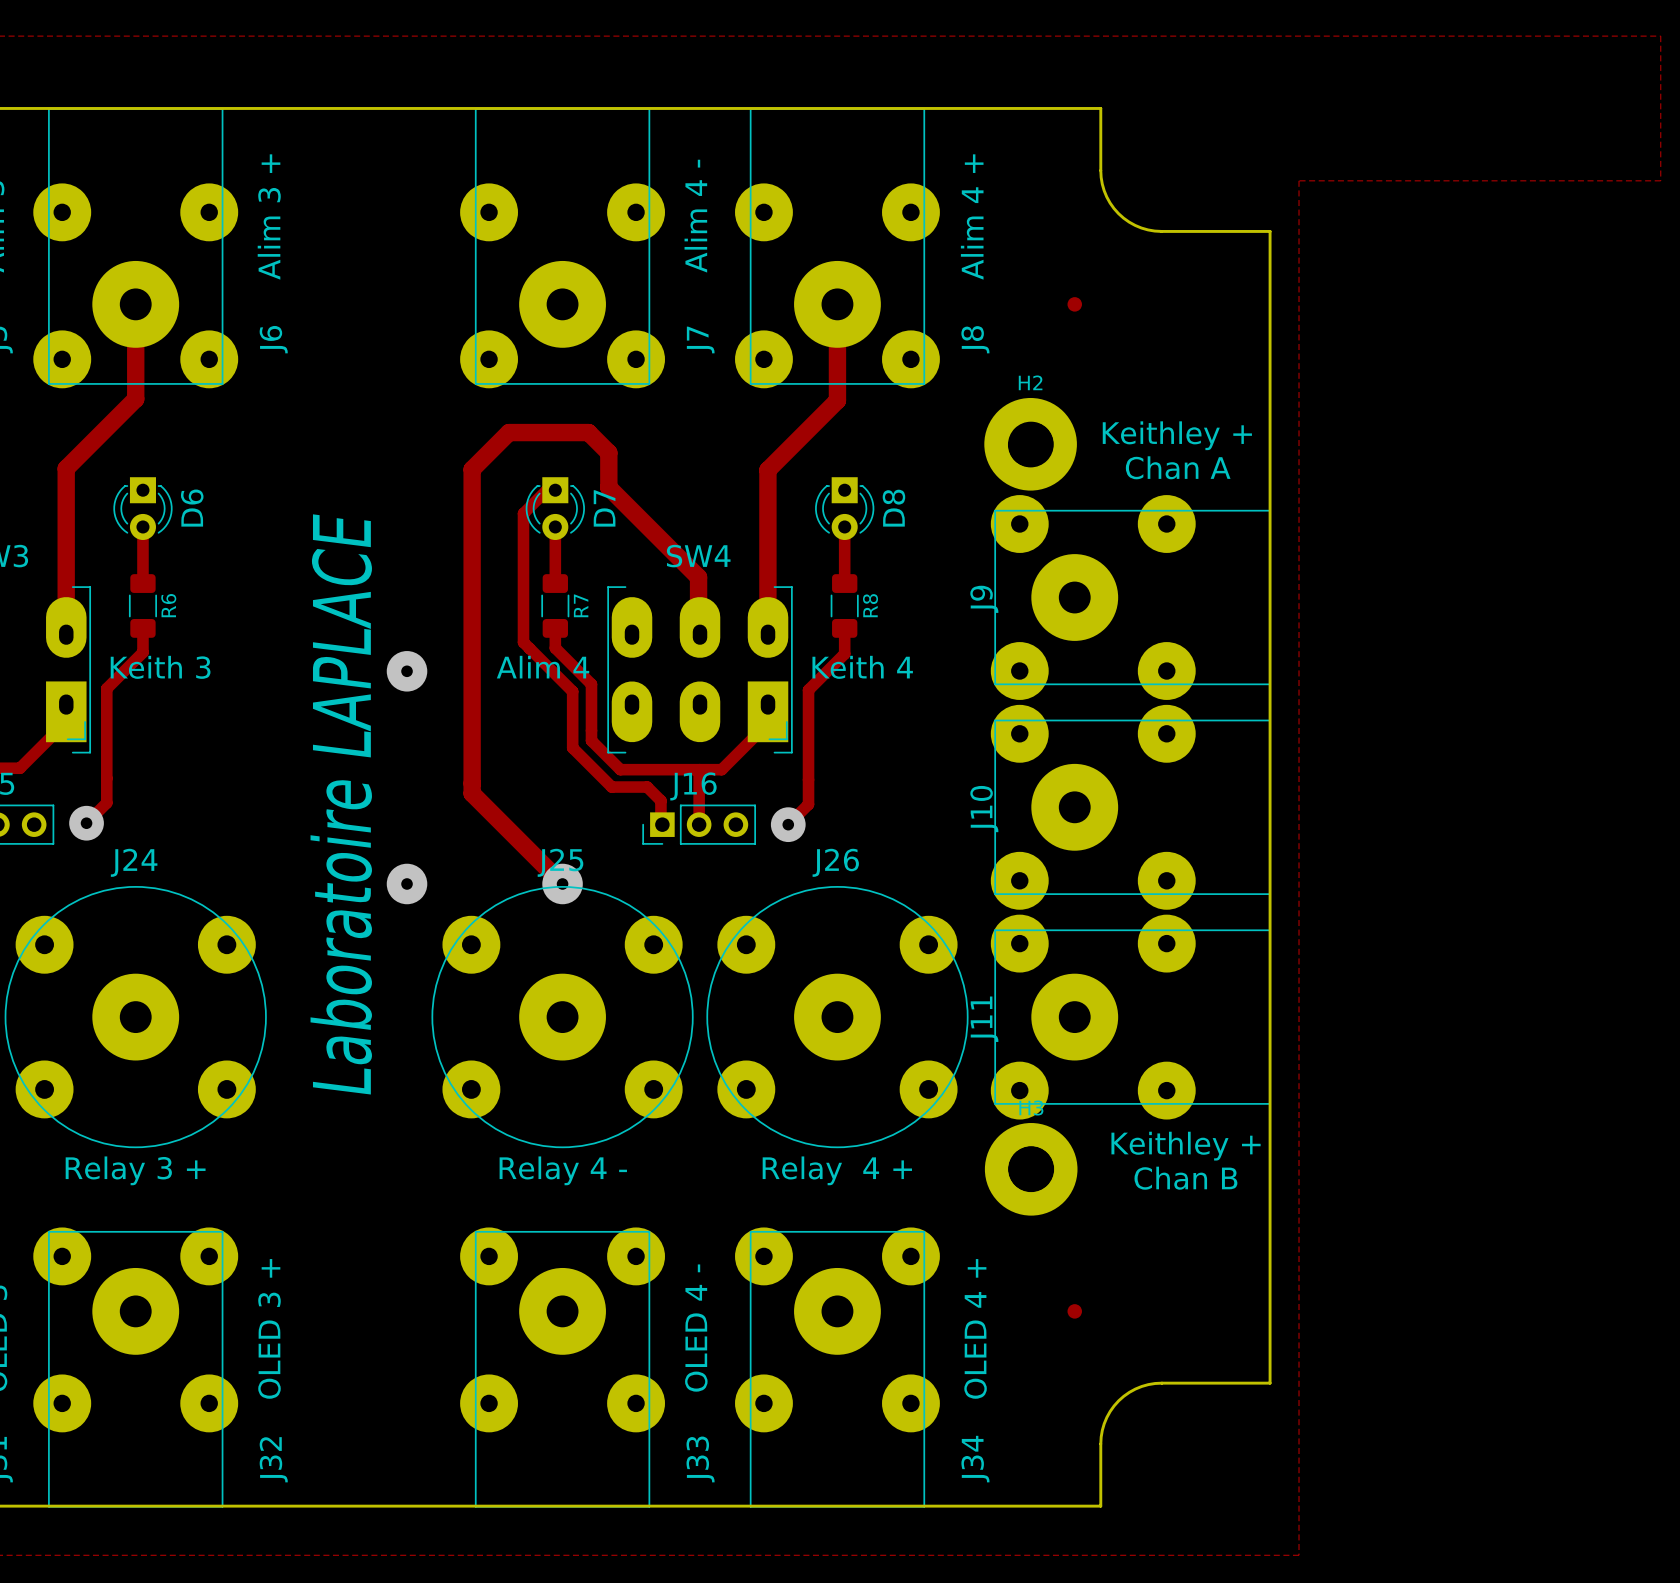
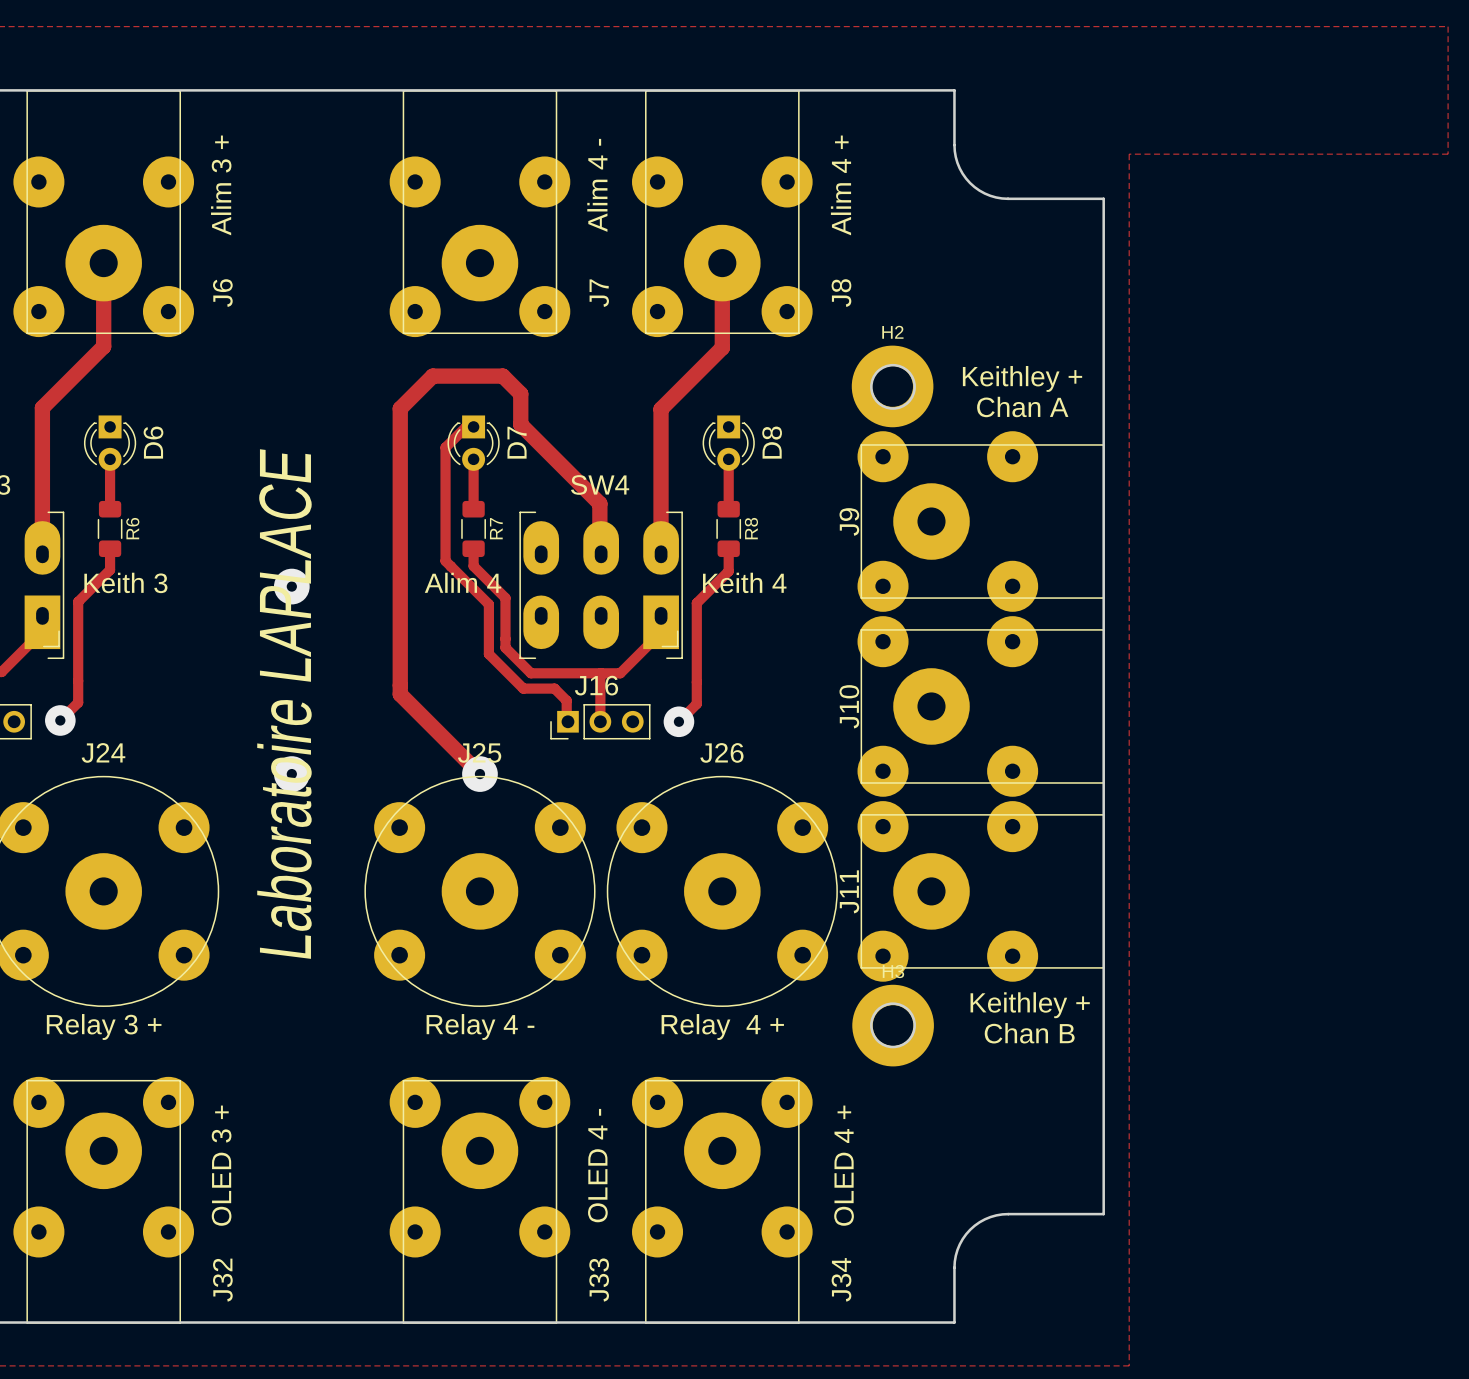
part: (1074, 304) -> none
via position: (407, 671) -> (291, 586)
via position: (407, 883) -> (291, 774)
part: (1074, 1311) -> none

